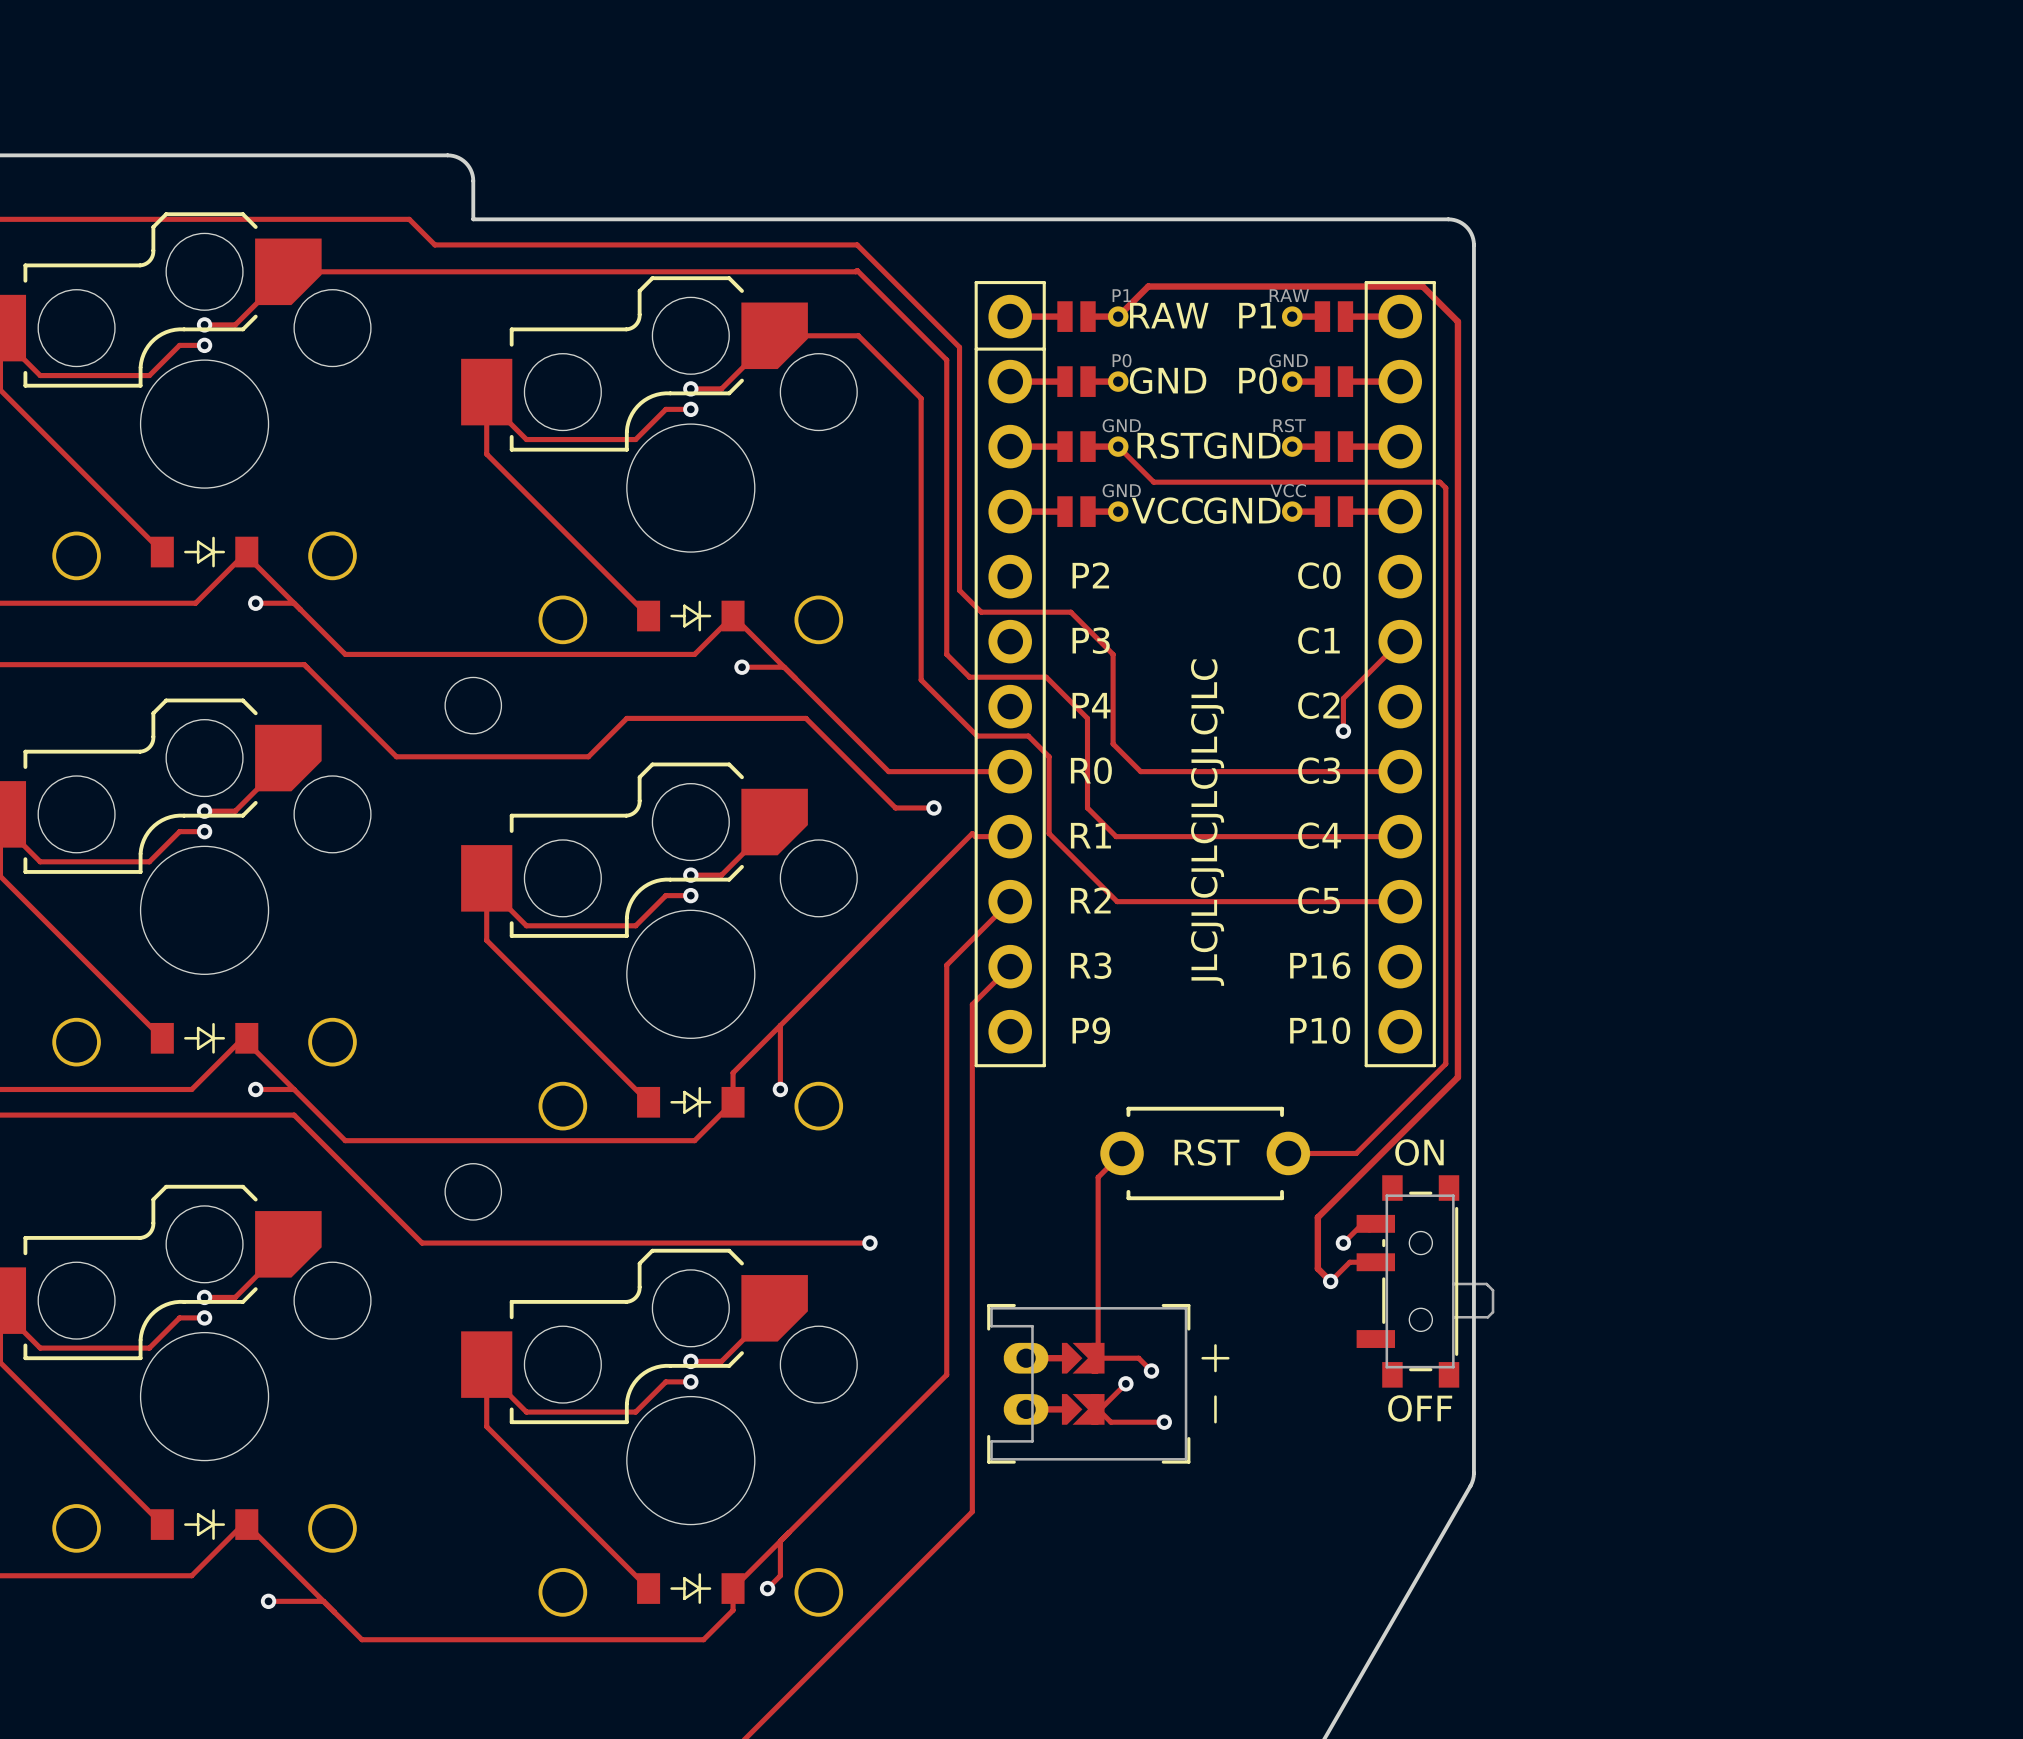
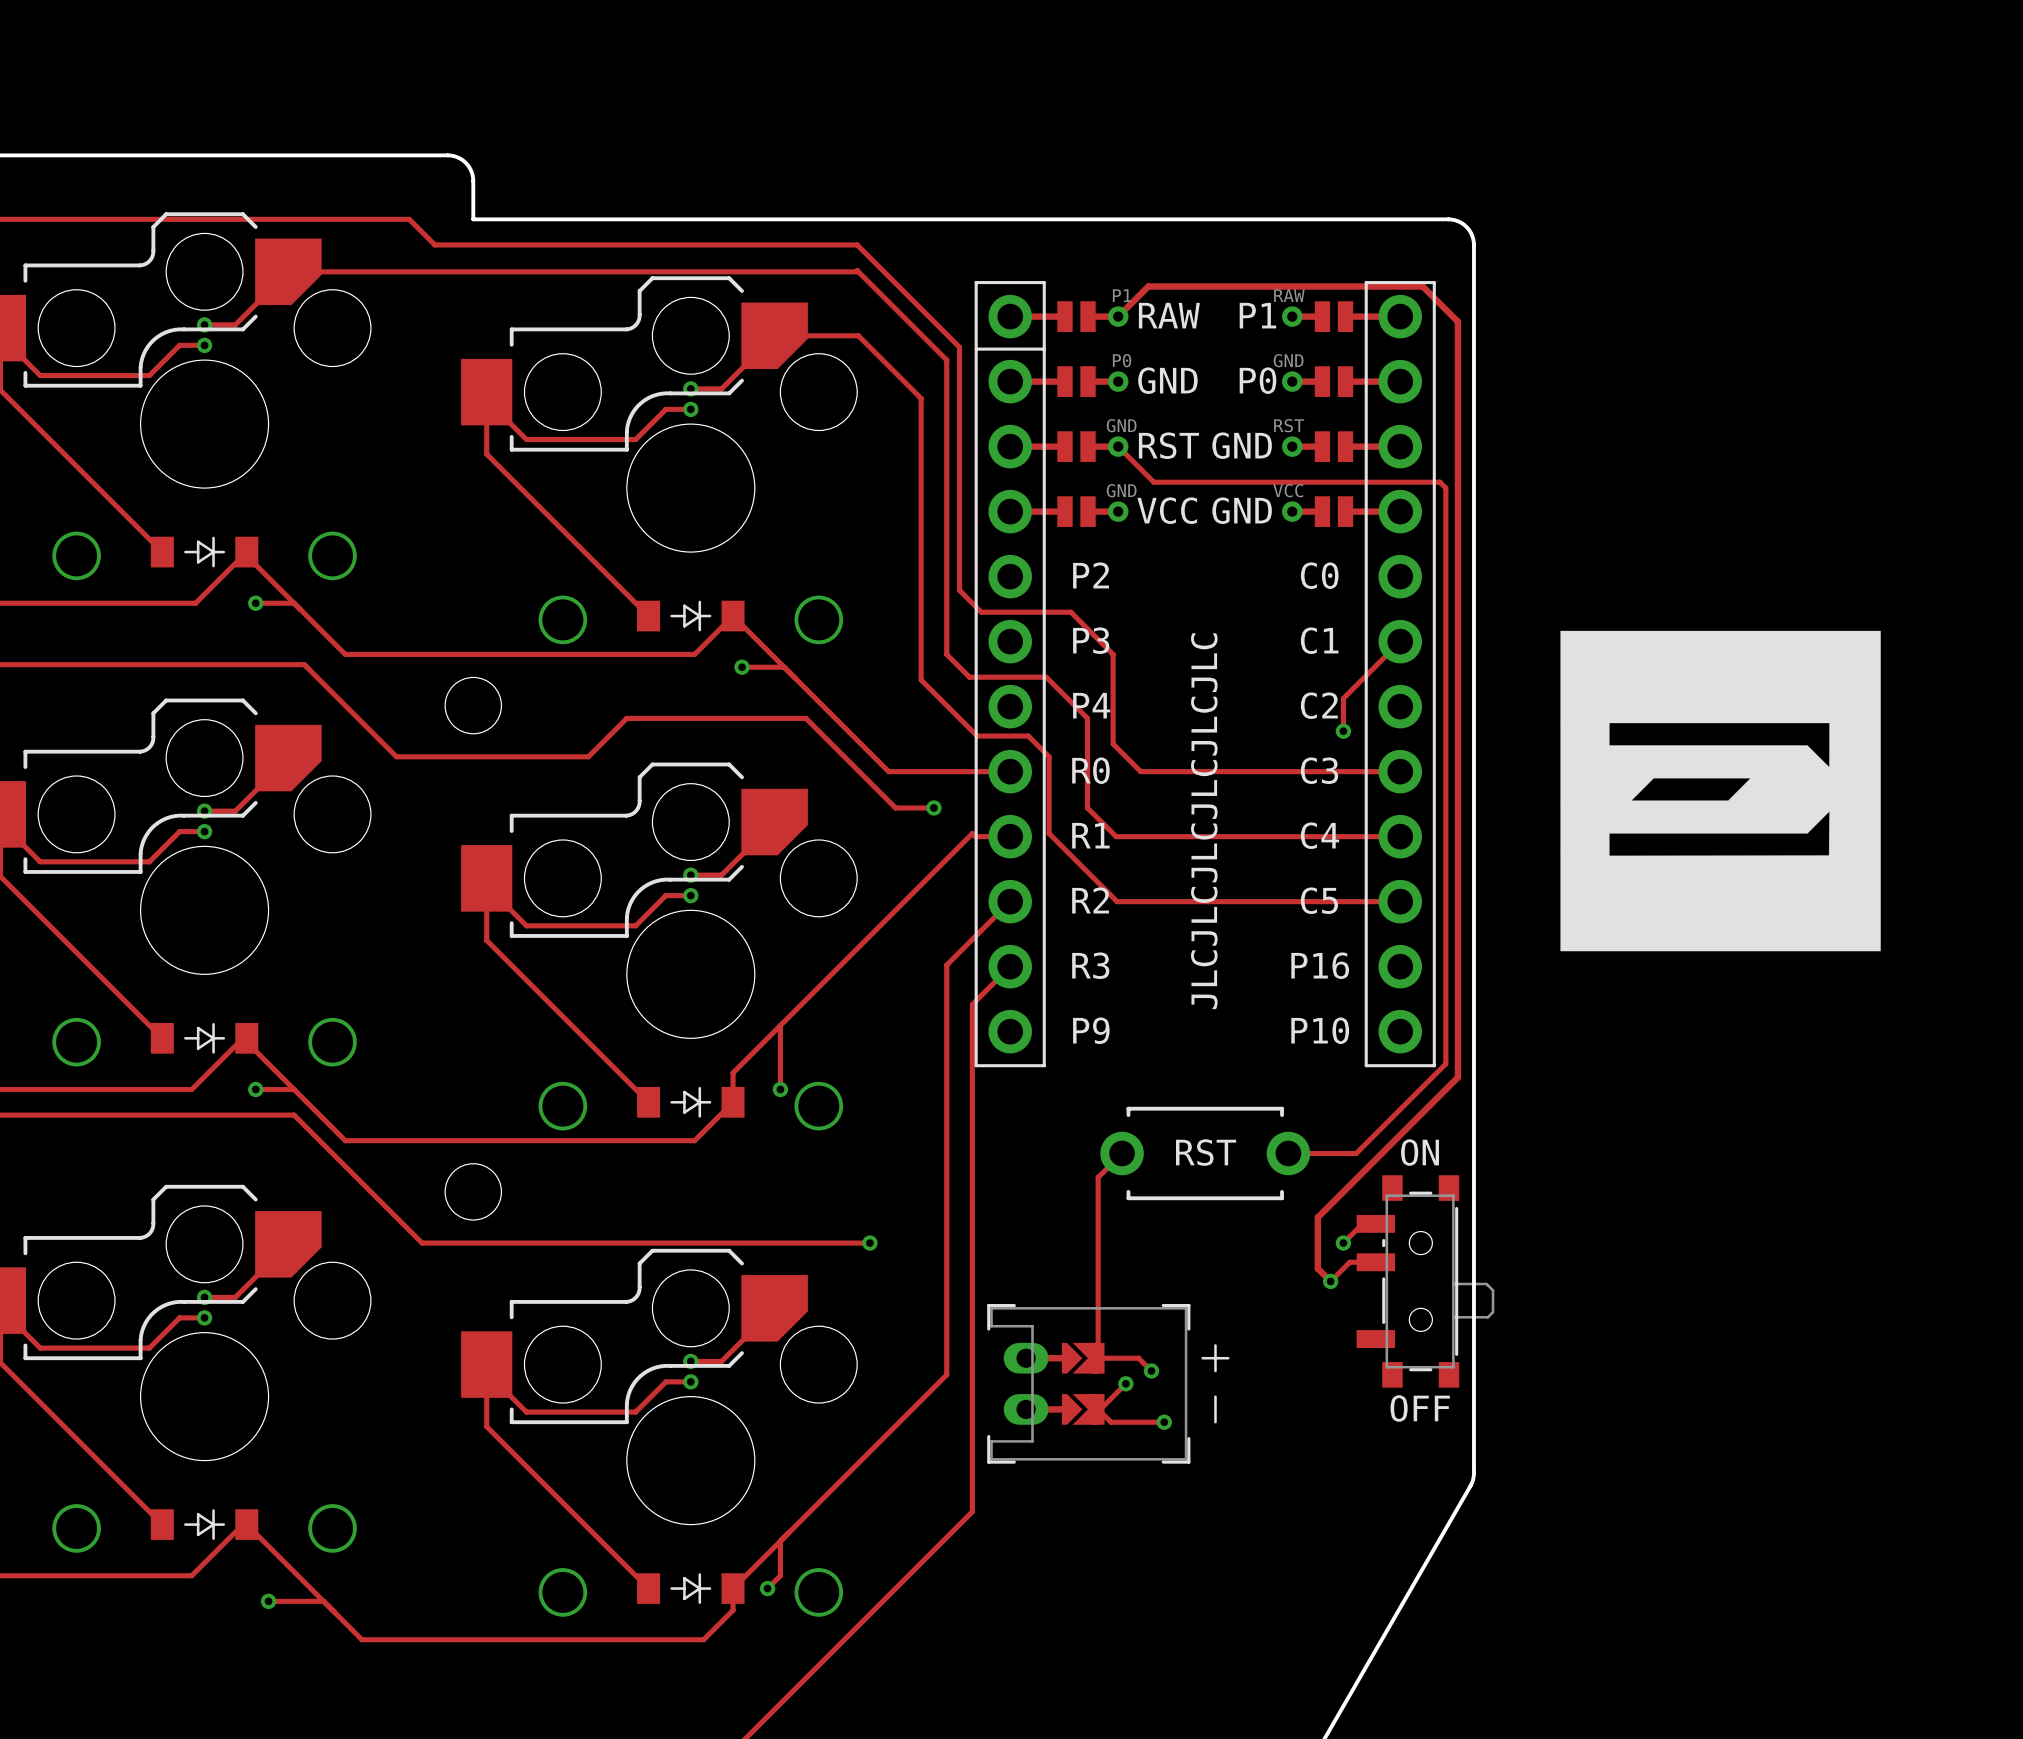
drawing: none -> [1560, 630, 1881, 952]

